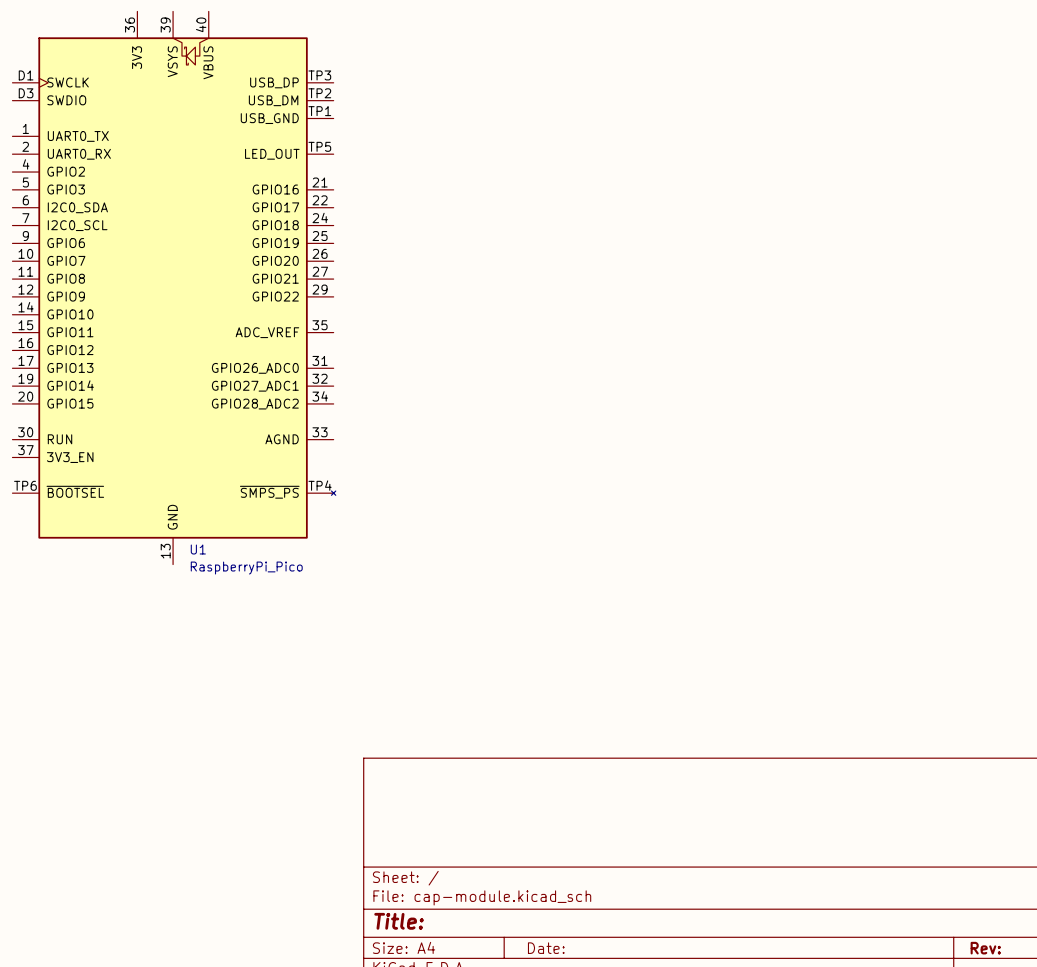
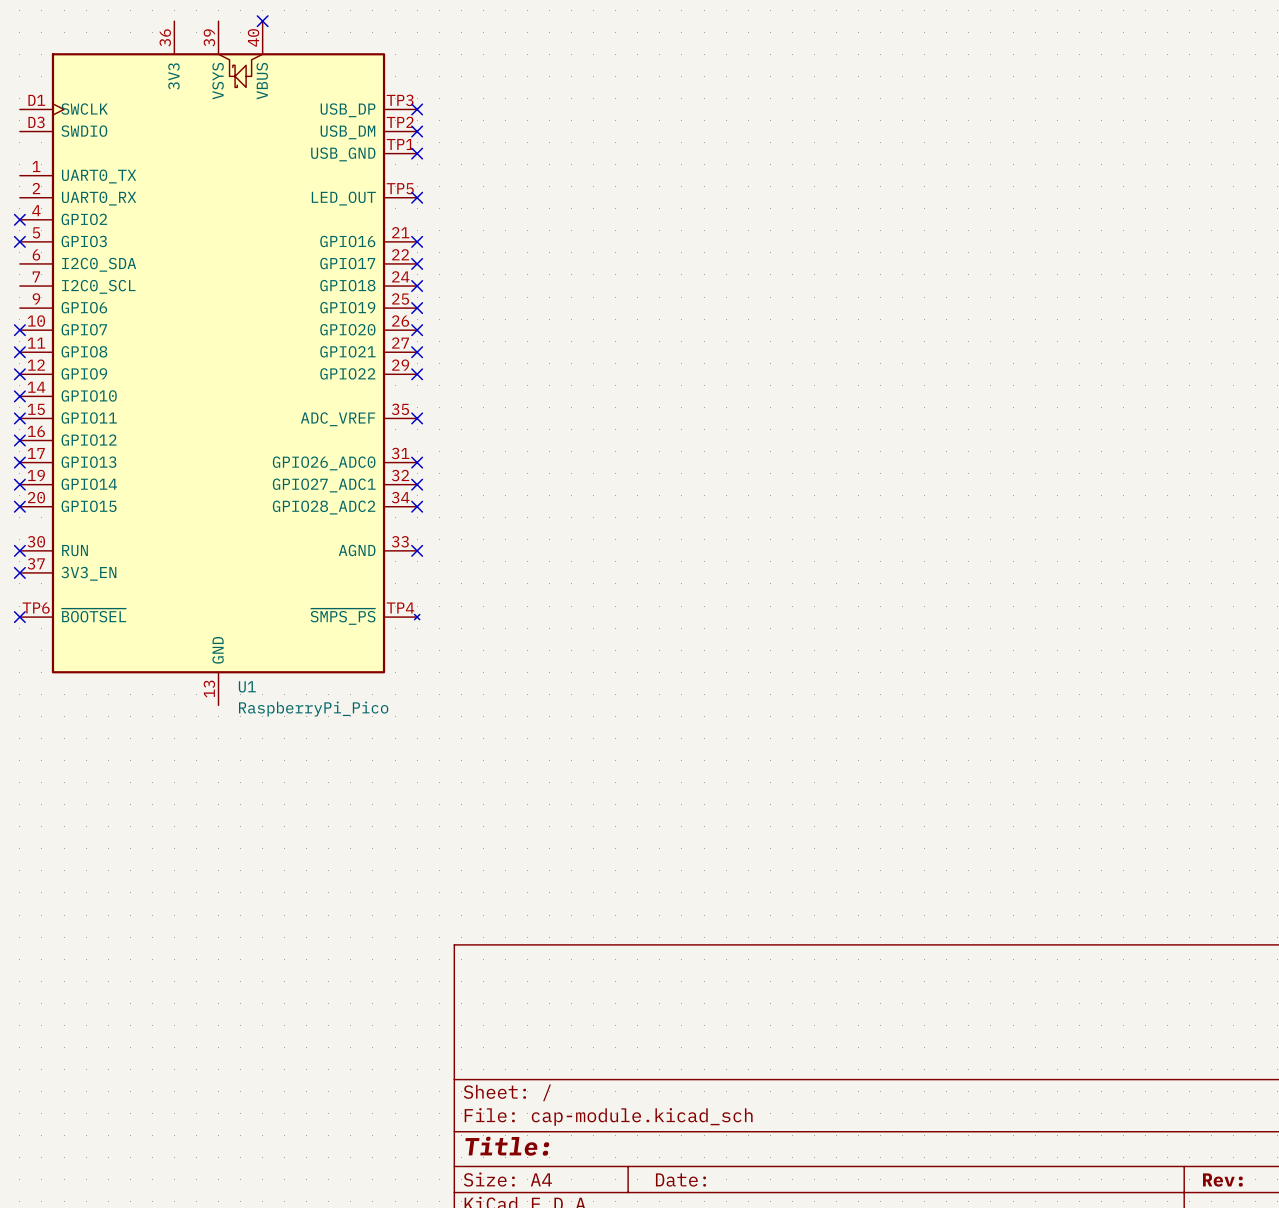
no-connect mark: none -> (262, 21)
no-connect mark: none -> (417, 109)
no-connect mark: none -> (417, 131)
no-connect mark: none -> (417, 153)
no-connect mark: none -> (417, 197)
no-connect mark: none -> (19, 219)
no-connect mark: none -> (19, 241)
no-connect mark: none -> (417, 241)
no-connect mark: none -> (417, 263)
no-connect mark: none -> (417, 286)
no-connect mark: none -> (417, 308)
no-connect mark: none -> (19, 330)
no-connect mark: none -> (417, 330)
no-connect mark: none -> (19, 352)
no-connect mark: none -> (417, 352)
no-connect mark: none -> (19, 374)
no-connect mark: none -> (417, 374)
no-connect mark: none -> (19, 396)
no-connect mark: none -> (19, 418)
no-connect mark: none -> (417, 418)
no-connect mark: none -> (19, 440)
no-connect mark: none -> (19, 462)
no-connect mark: none -> (417, 462)
no-connect mark: none -> (19, 484)
no-connect mark: none -> (417, 484)
no-connect mark: none -> (19, 506)
no-connect mark: none -> (417, 506)
no-connect mark: none -> (19, 550)
no-connect mark: none -> (417, 550)
no-connect mark: none -> (19, 572)
no-connect mark: none -> (19, 617)

